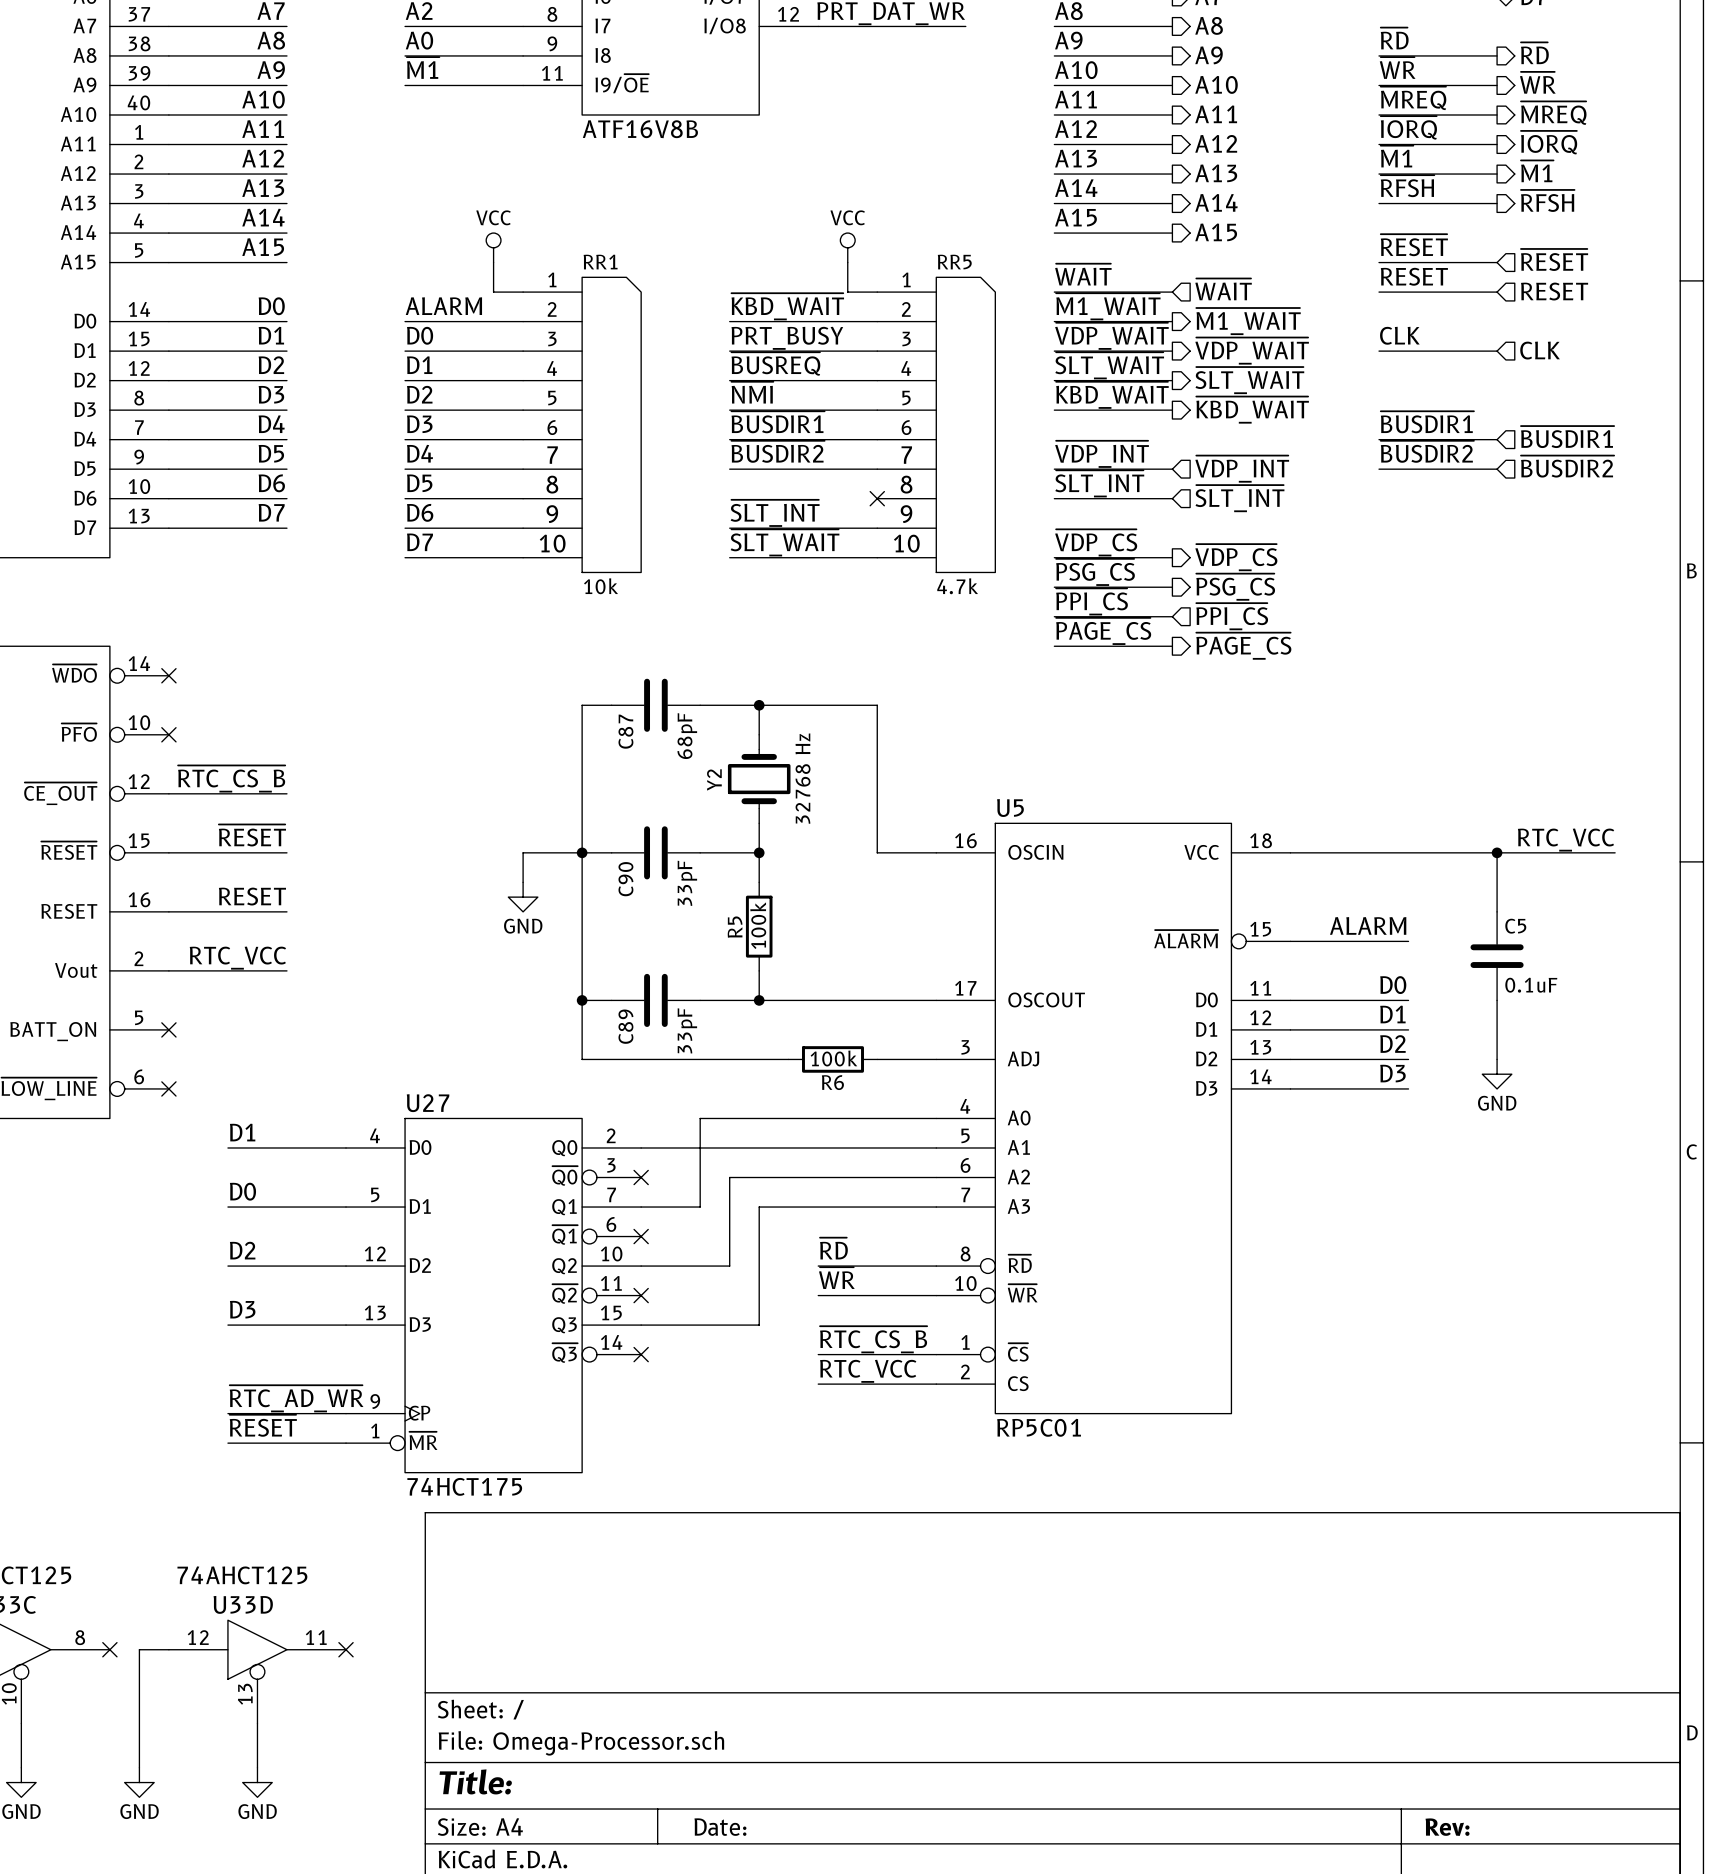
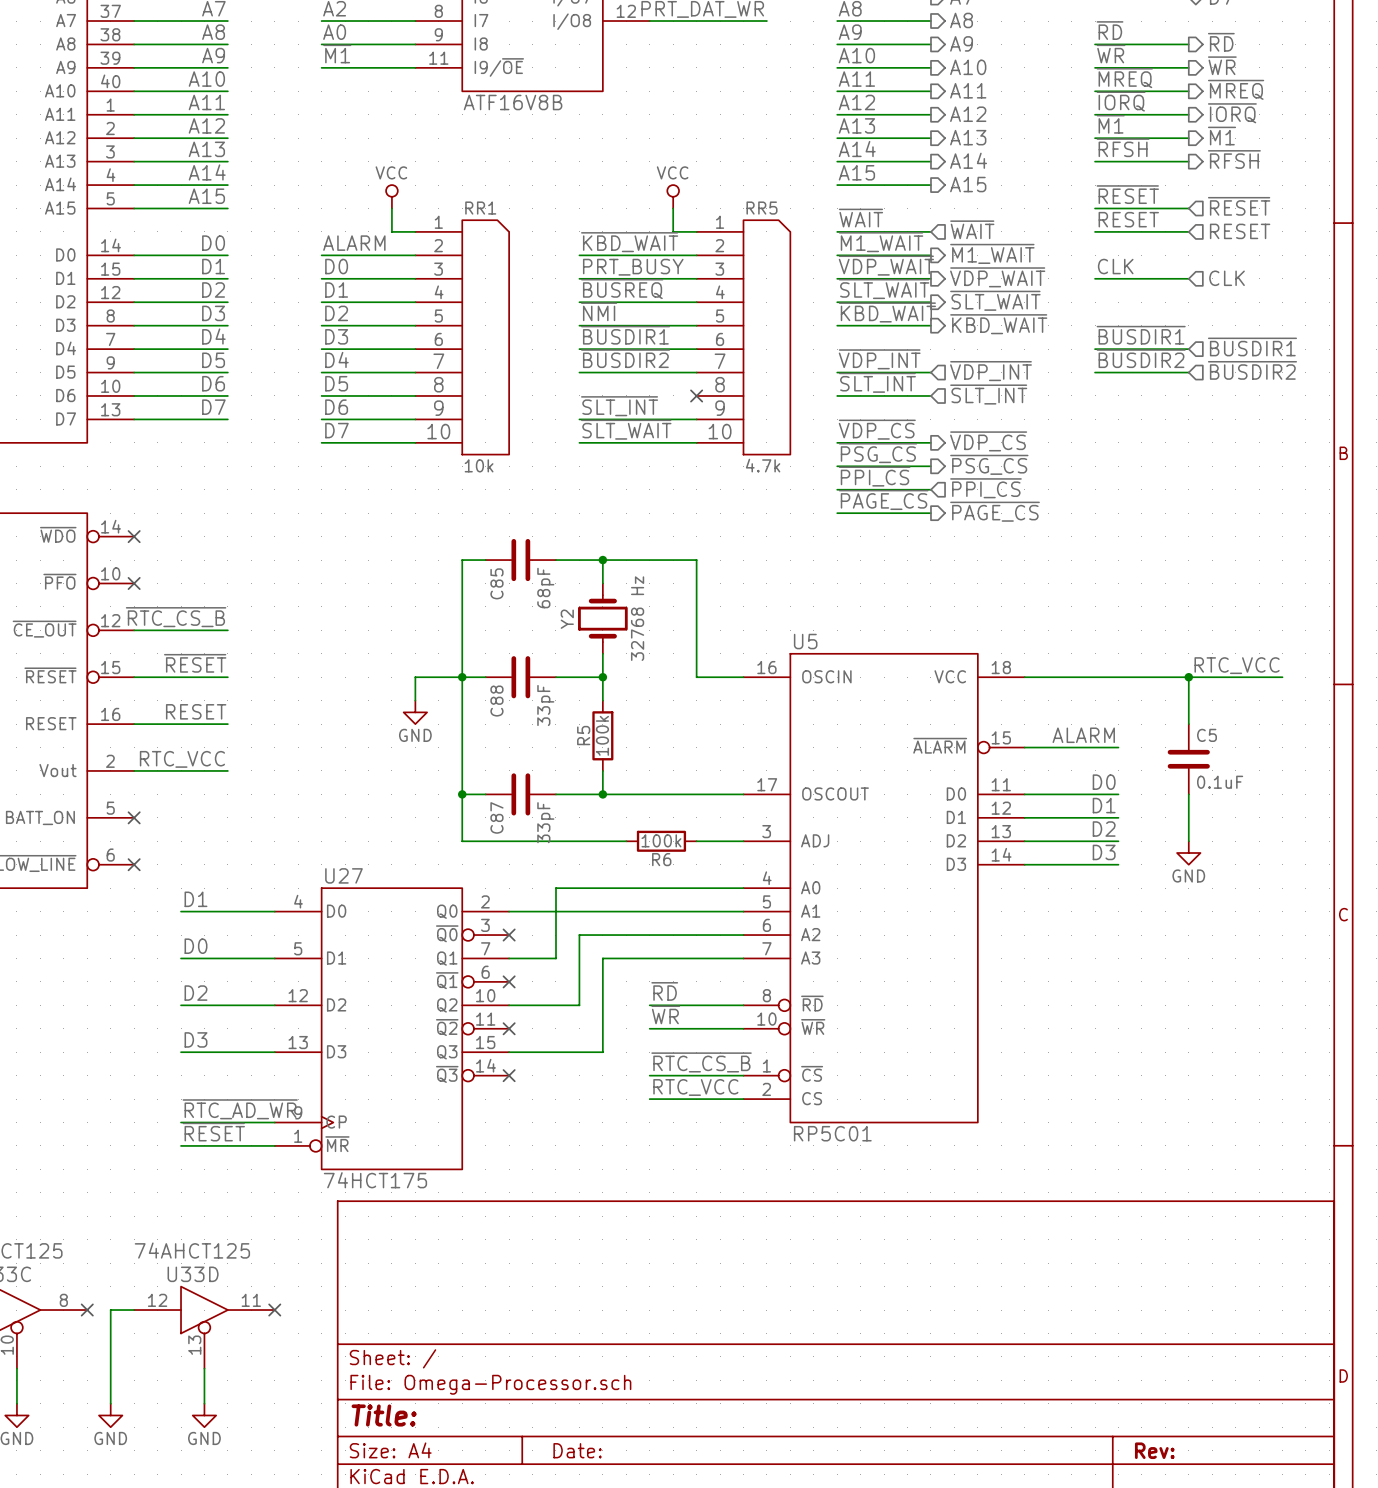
C87 name: C87 (625, 731) -> C85 (496, 583)
C90 name: C90 (625, 879) -> C88 (496, 701)
C89 name: C89 (625, 1026) -> C87 (496, 817)

